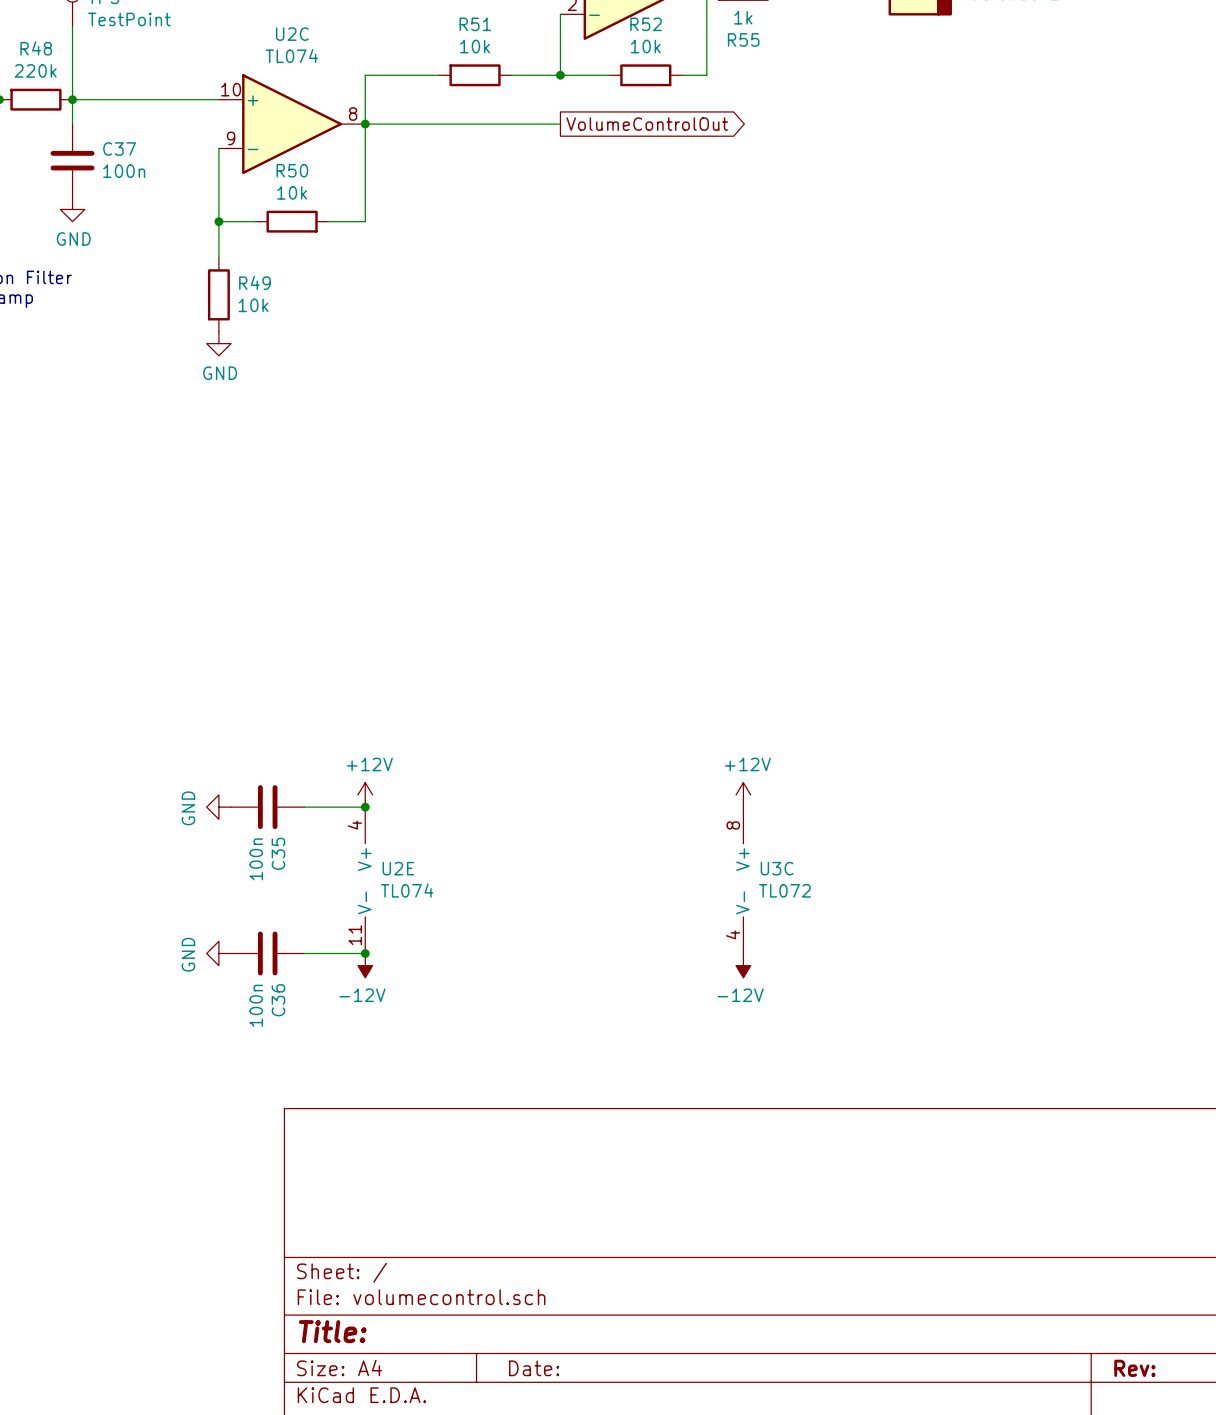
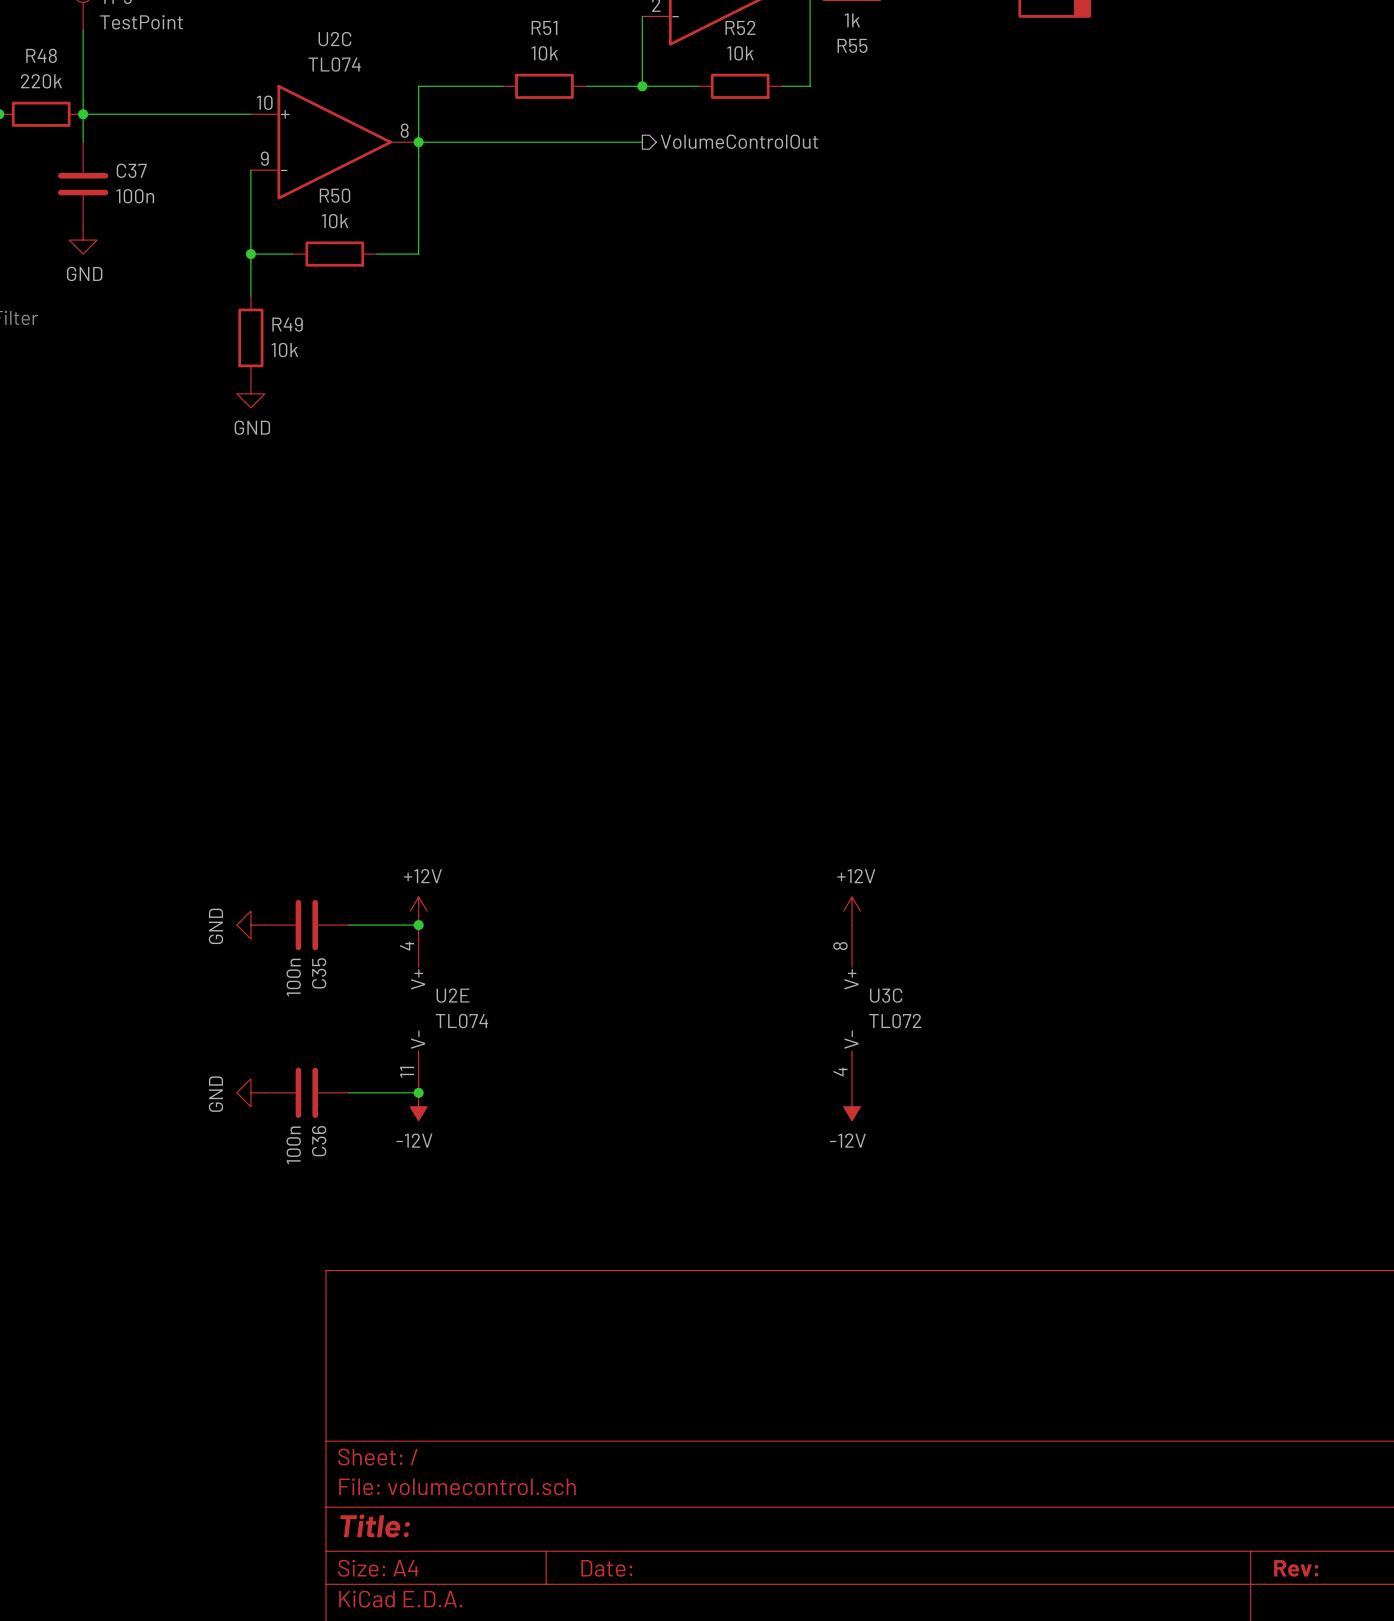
hierarchical label: none -> VolumeControlOut (739, 141)
global label: VolumeControlOut (647, 124) -> none

